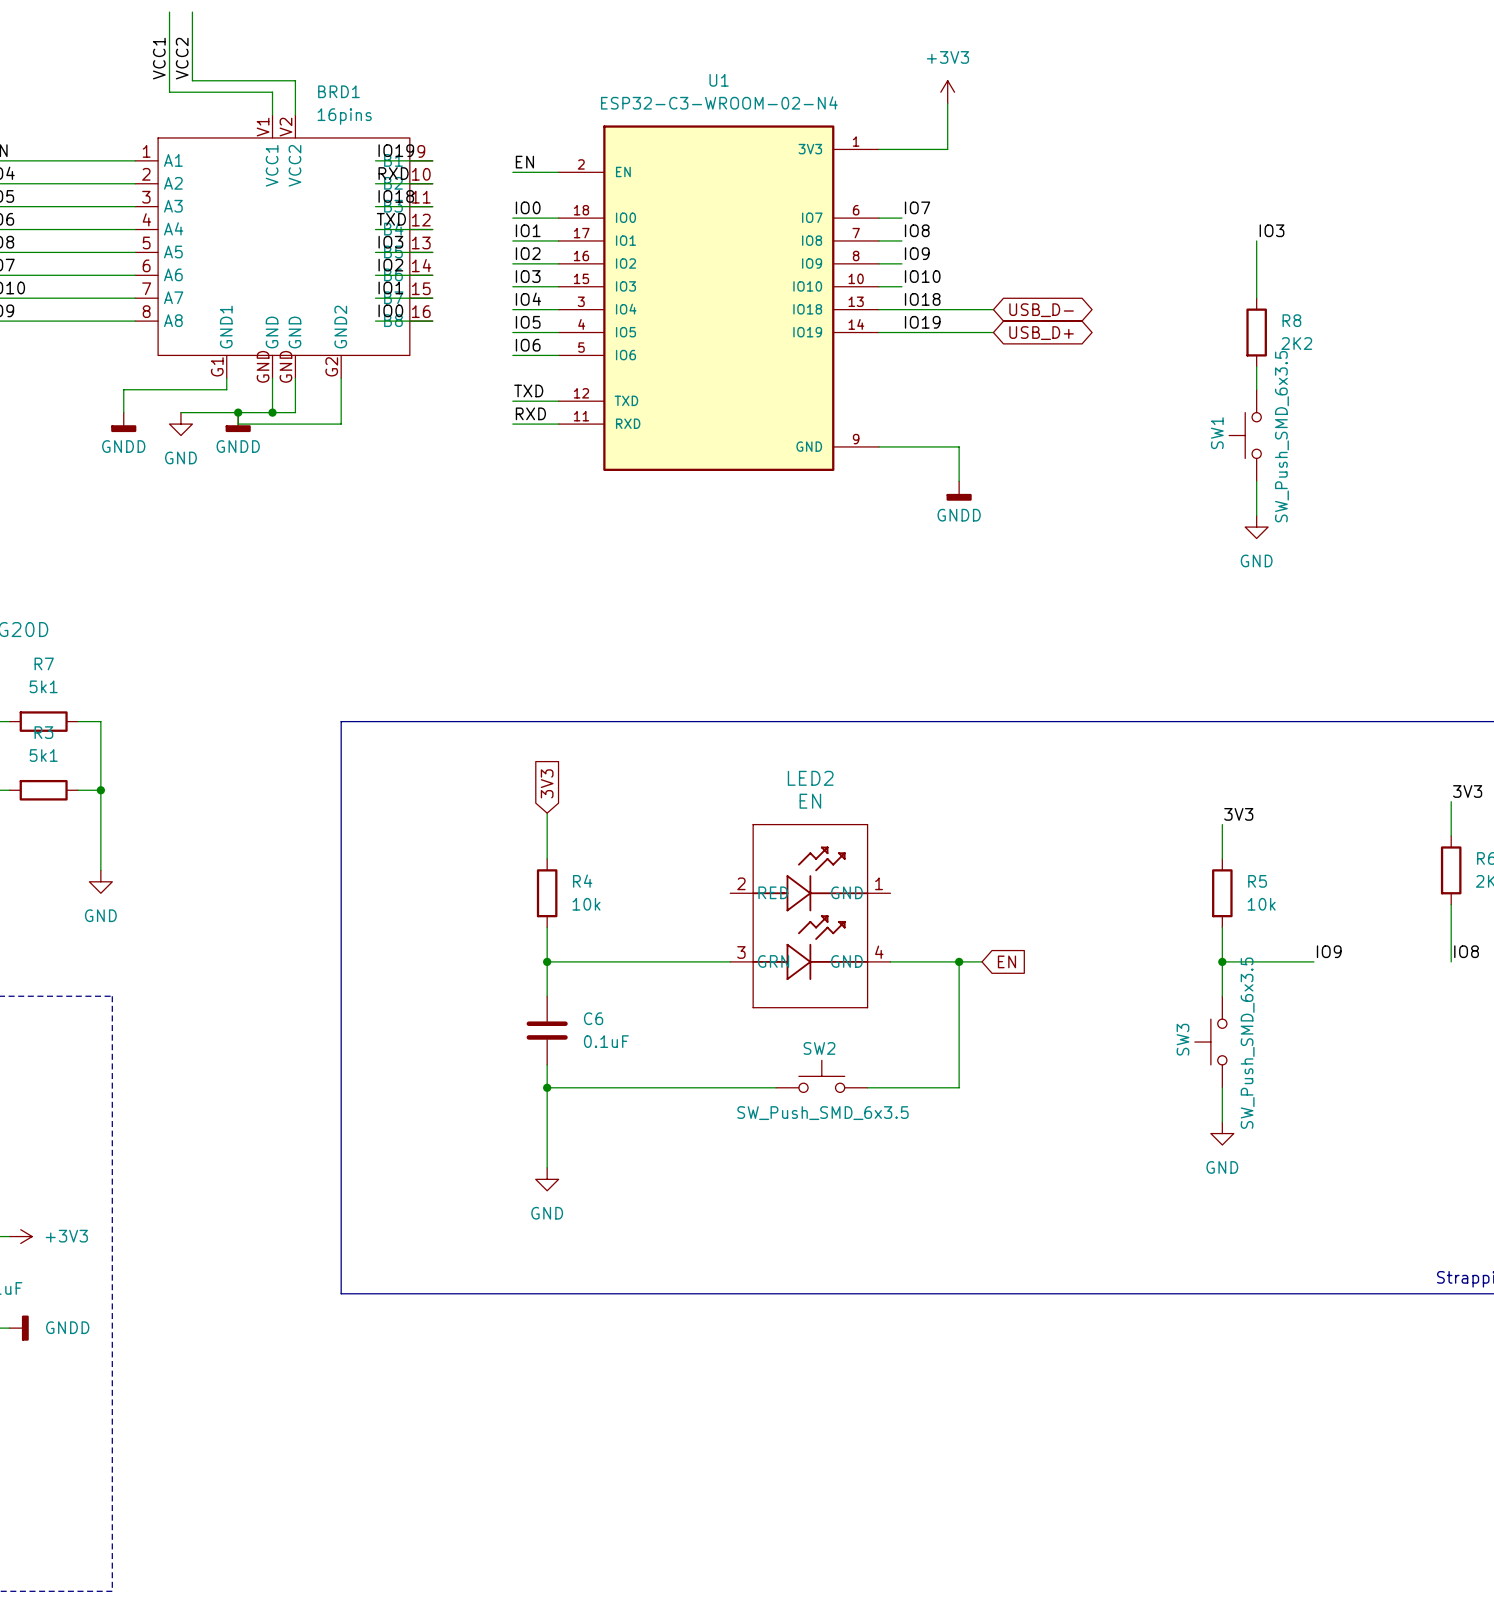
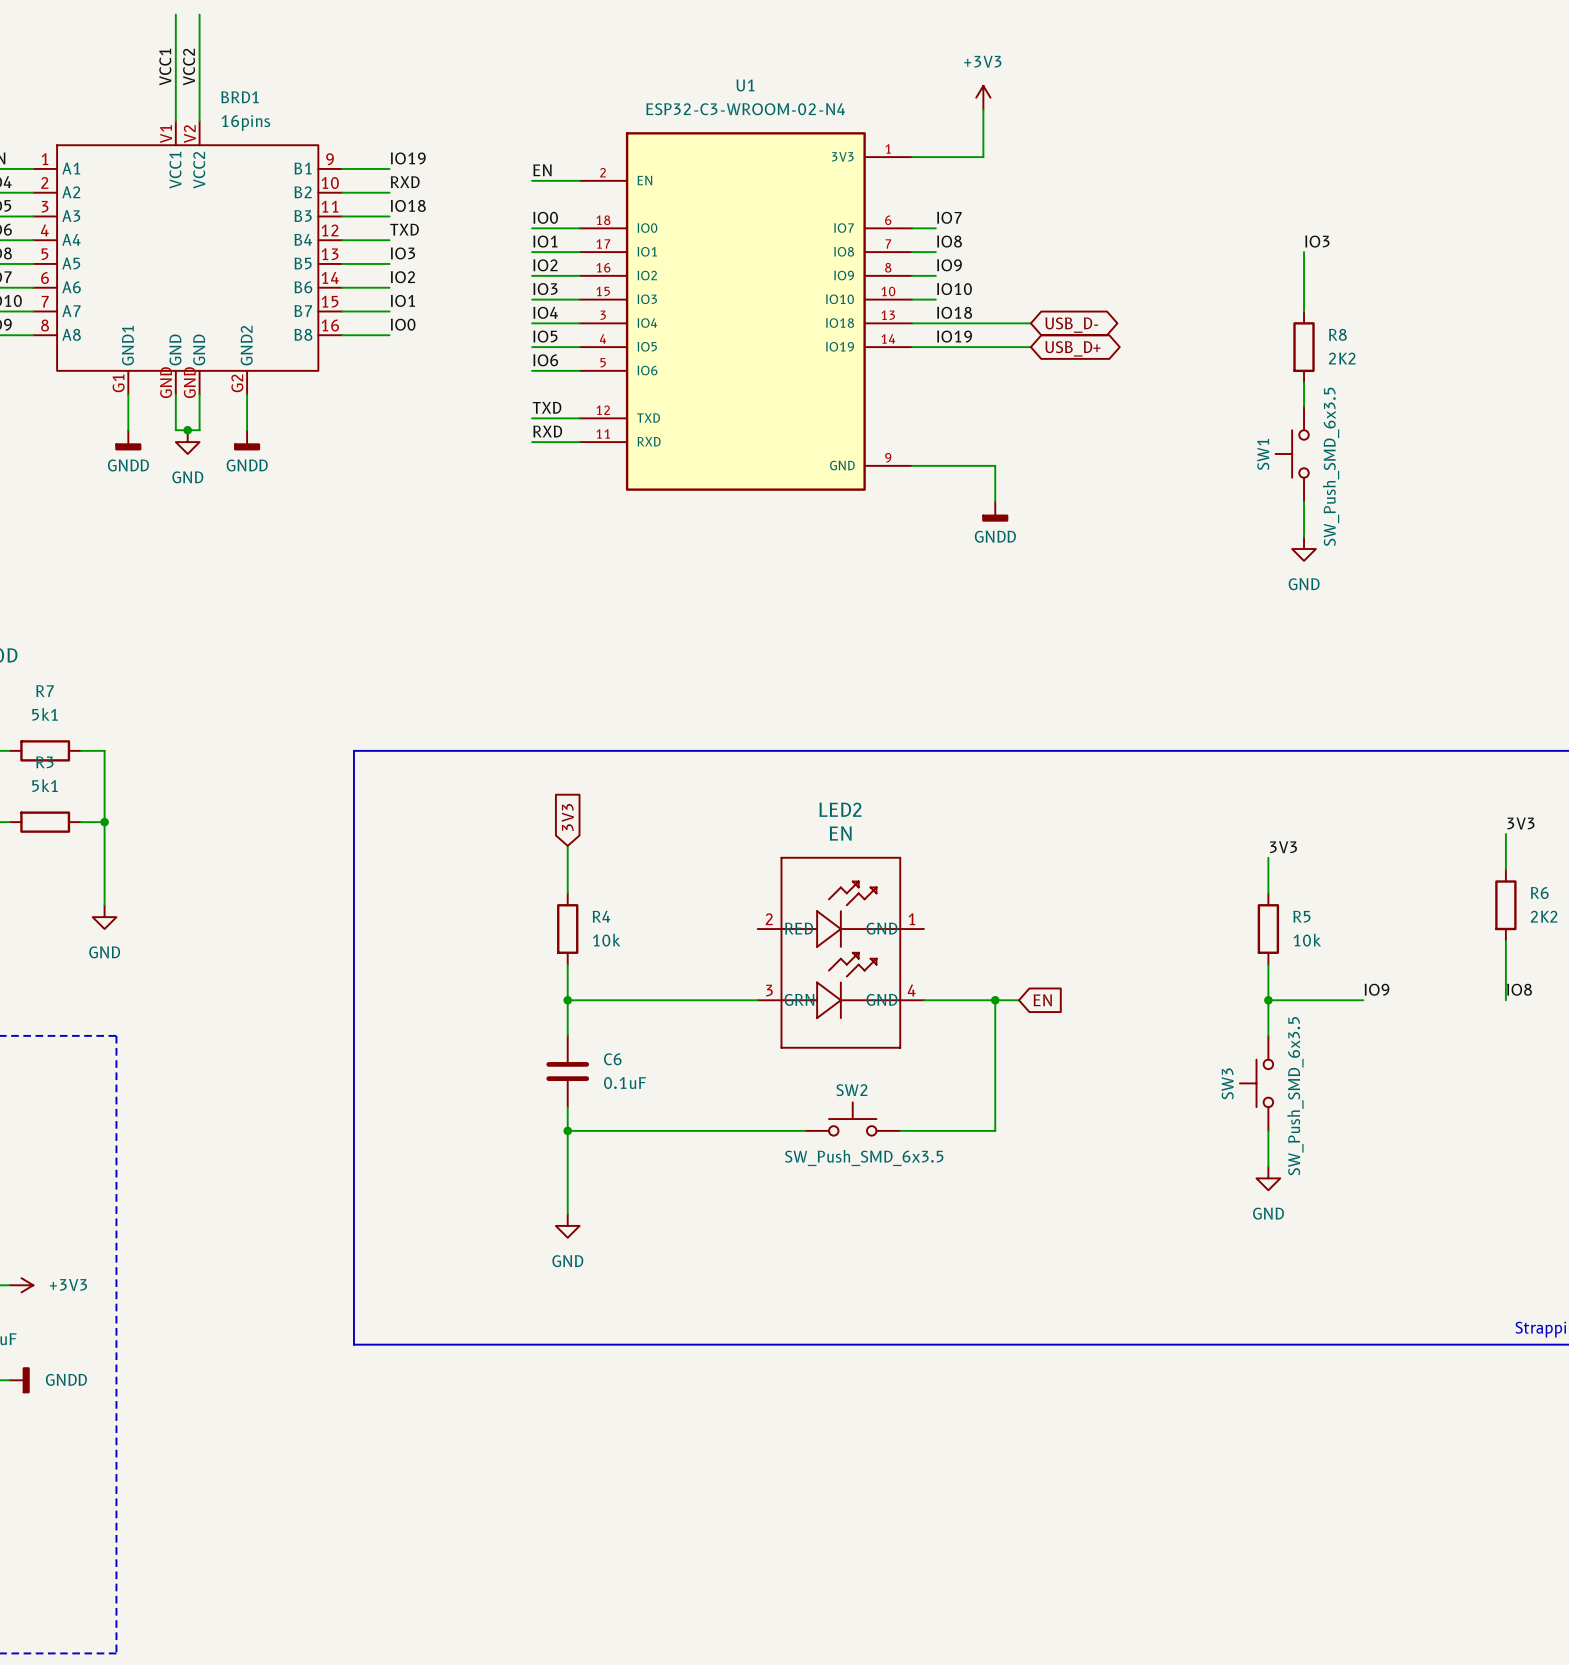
wire: (192, 80) (295, 80) (295, 115) -> (199, 85) (199, 121)
wire: (169, 92) (272, 92) (272, 115) -> (175, 97) (175, 121)
wire: (32, 160) (135, 160) -> none
wire: (375, 160) (432, 160) -> (389, 168) (342, 168)
wire: (32, 183) (135, 183) -> none
wire: (375, 183) (432, 183) -> (389, 192) (342, 192)
wire: (32, 206) (135, 206) -> none
wire: (375, 206) (432, 206) -> (389, 216) (342, 216)
wire: (32, 229) (135, 229) -> none
wire: (375, 229) (432, 229) -> (389, 240) (342, 240)
BRD1 position: (283, 246) -> (187, 258)
wire: (32, 252) (135, 252) -> none
wire: (375, 252) (432, 252) -> (389, 263) (342, 263)
wire: (32, 275) (135, 275) -> none
wire: (375, 275) (432, 275) -> (389, 287) (342, 287)
wire: (32, 298) (135, 298) -> none
wire: (375, 298) (432, 298) -> (389, 311) (342, 311)
wire: (32, 321) (135, 321) -> none
wire: (375, 321) (432, 321) -> (389, 335) (342, 335)
wire: none -> (175, 394) (175, 430) (187, 430)
wire: (226, 378) (226, 389) (123, 389) -> (128, 394) (128, 406)
wire: (272, 378) (272, 412) -> none
wire: (295, 378) (295, 412) (192, 412) -> (199, 394) (199, 430)
wire: (341, 378) (341, 424) (238, 424) (238, 412) -> (247, 394) (247, 430)
junction: none -> (187, 430)
junction: (238, 412) -> none
junction: (272, 412) -> none

